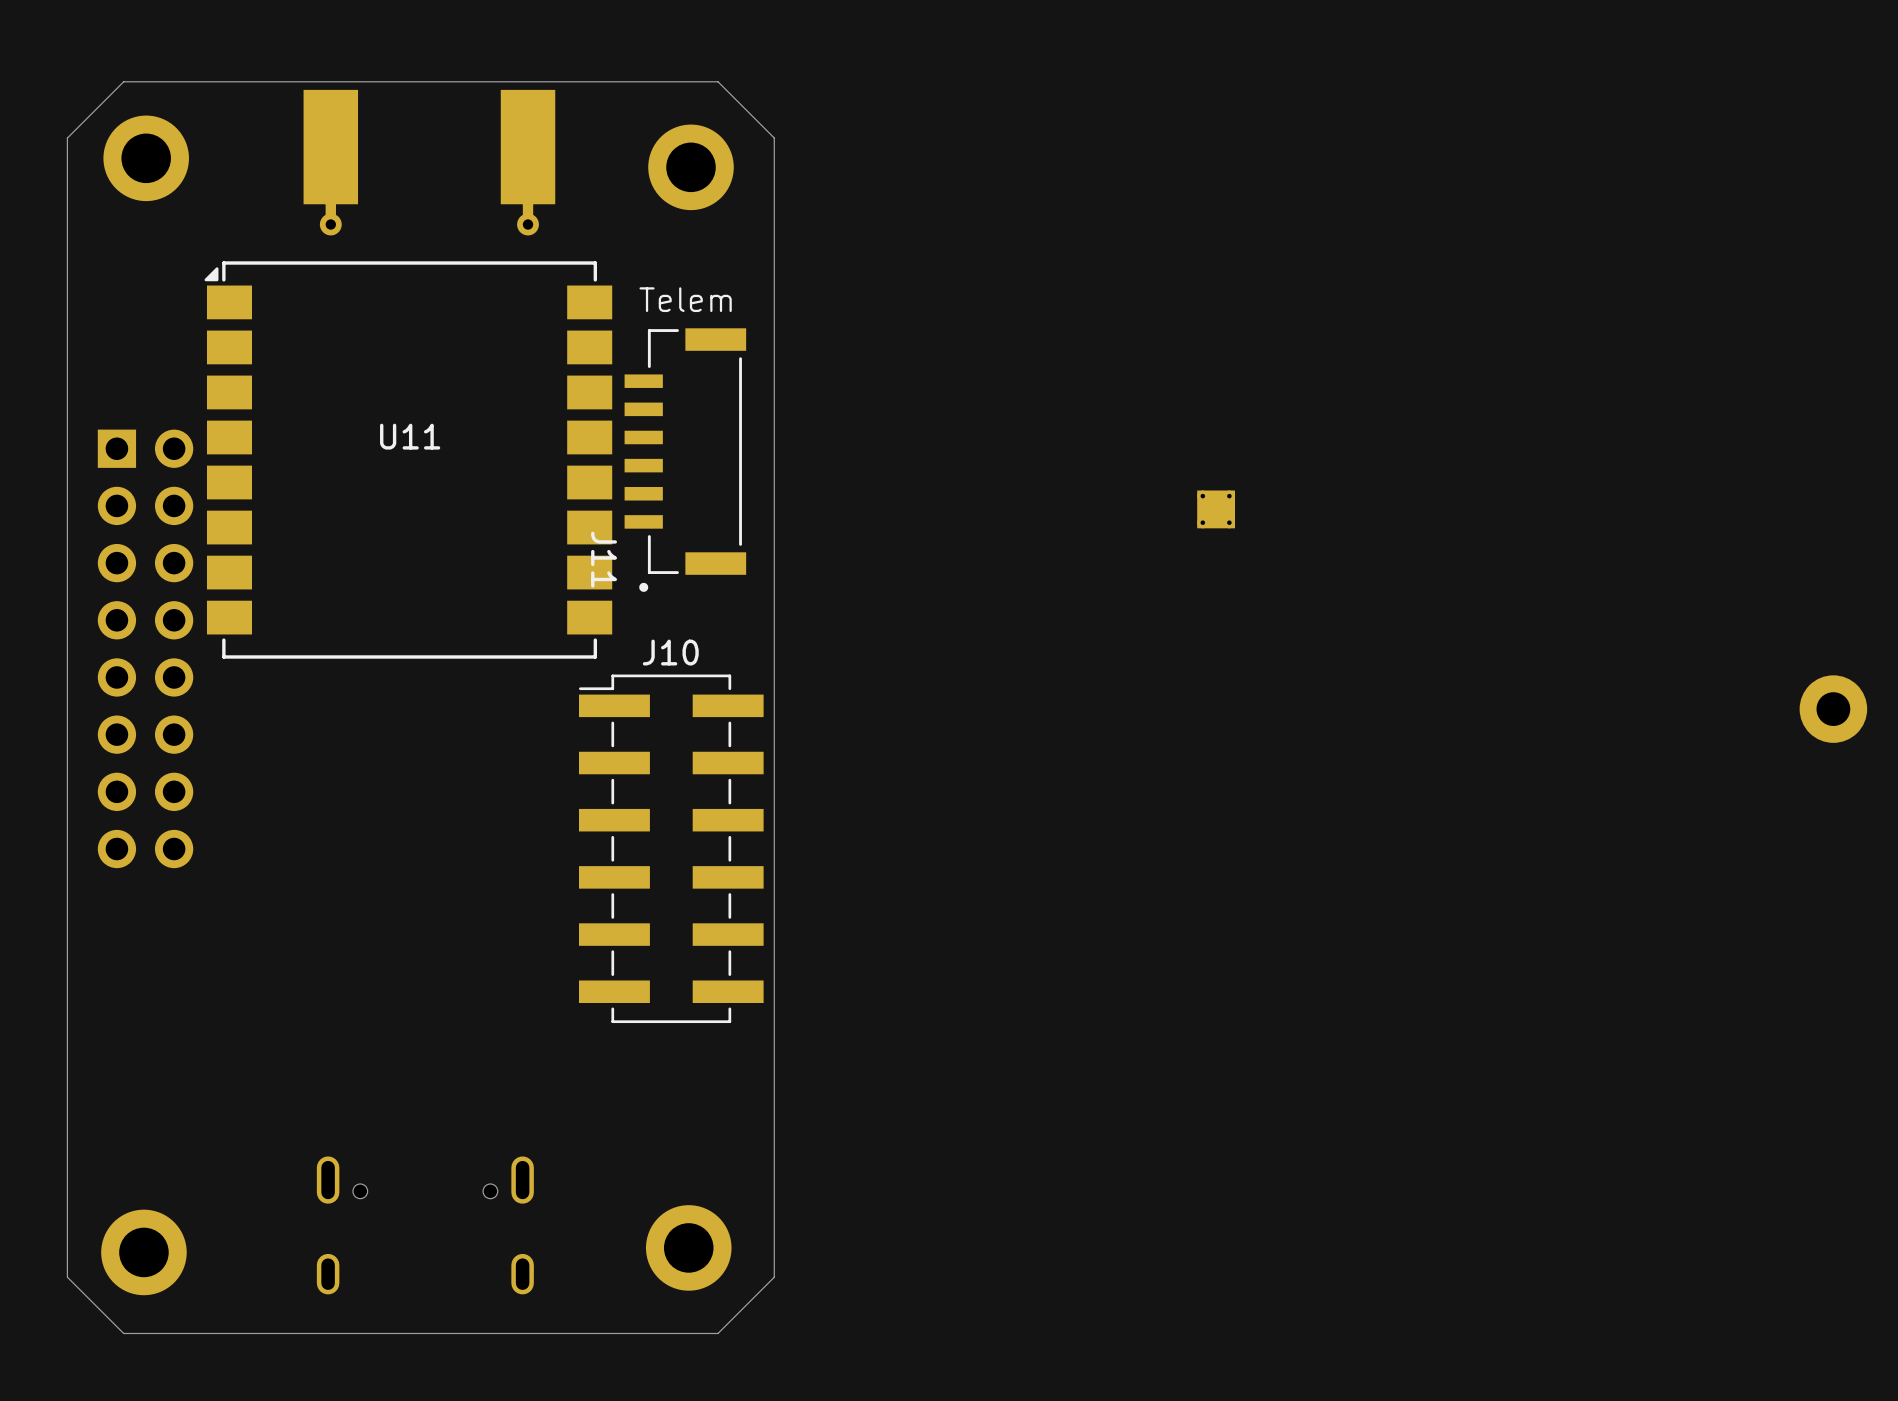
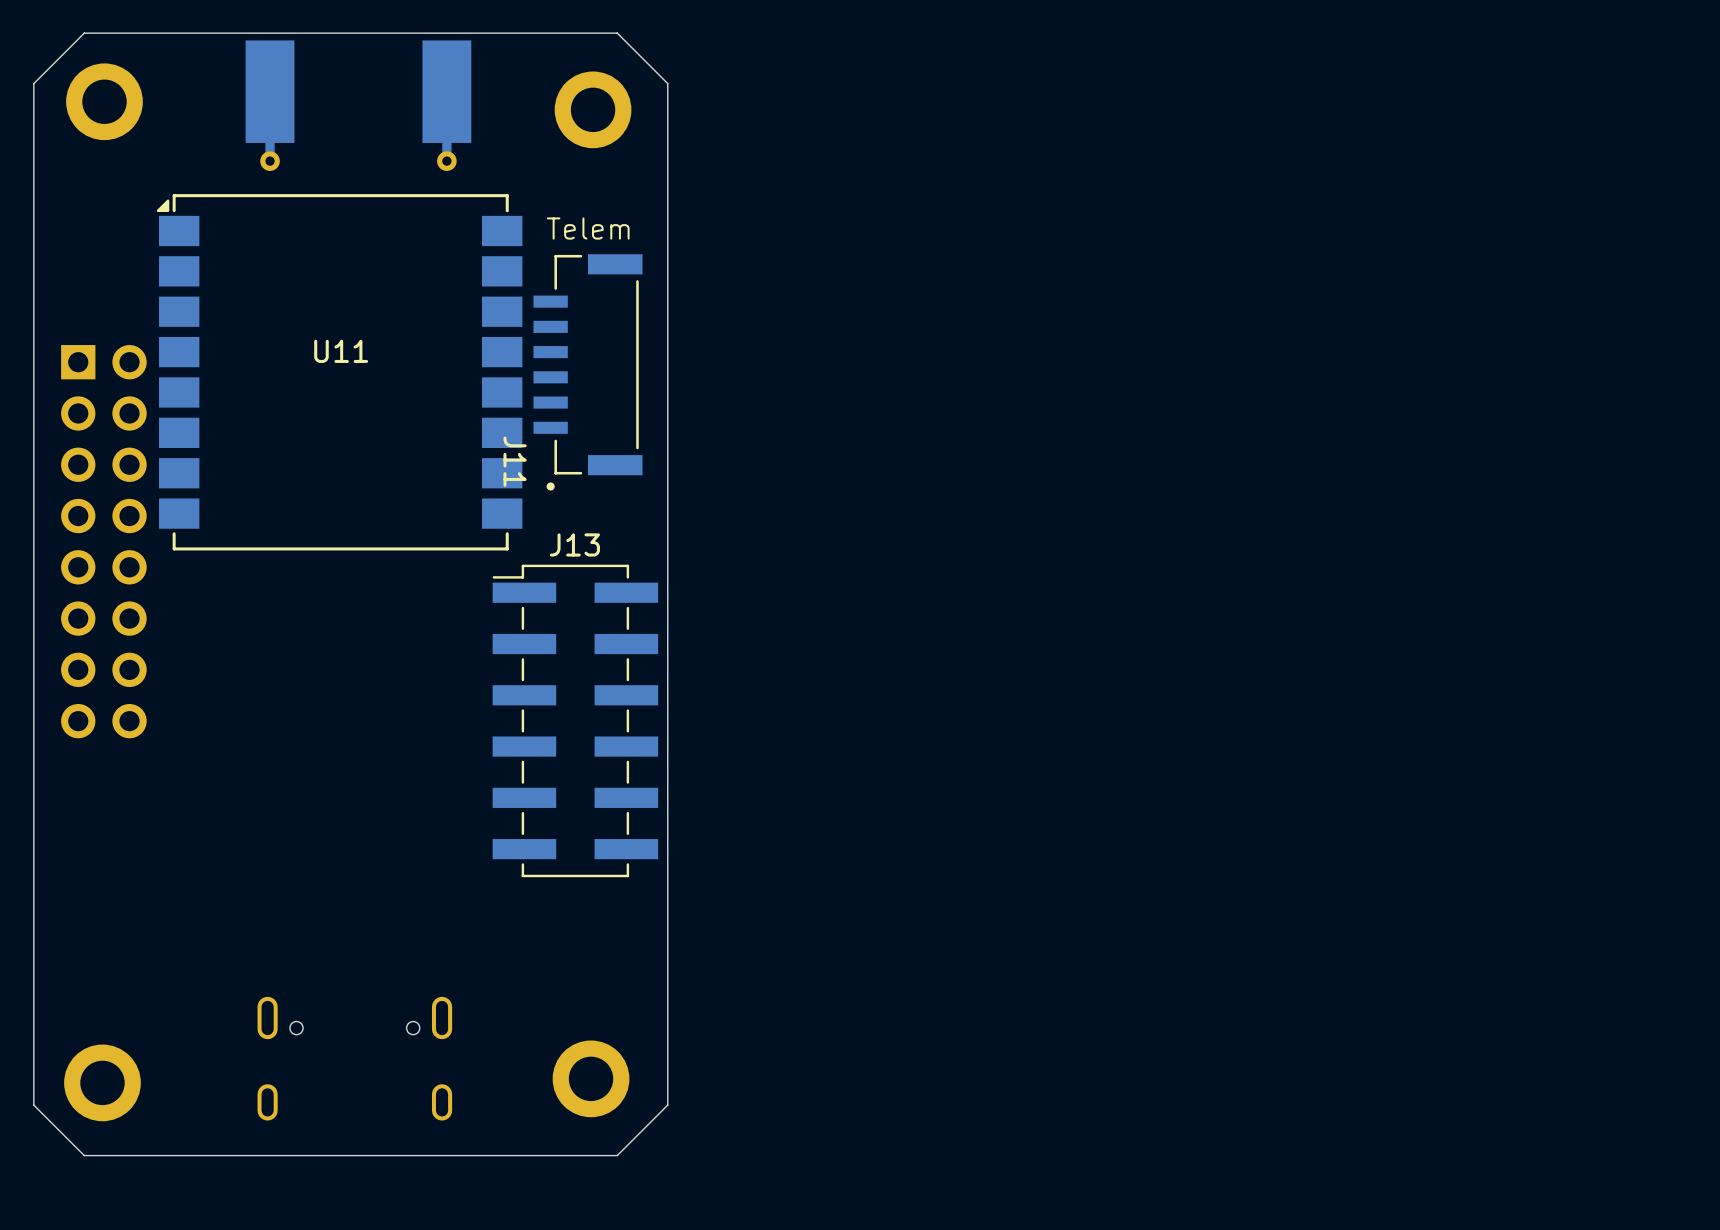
part: (1216, 509) -> none
J10 name: J10 (670, 652) -> J13 (574, 544)
part: (1833, 709) -> none

